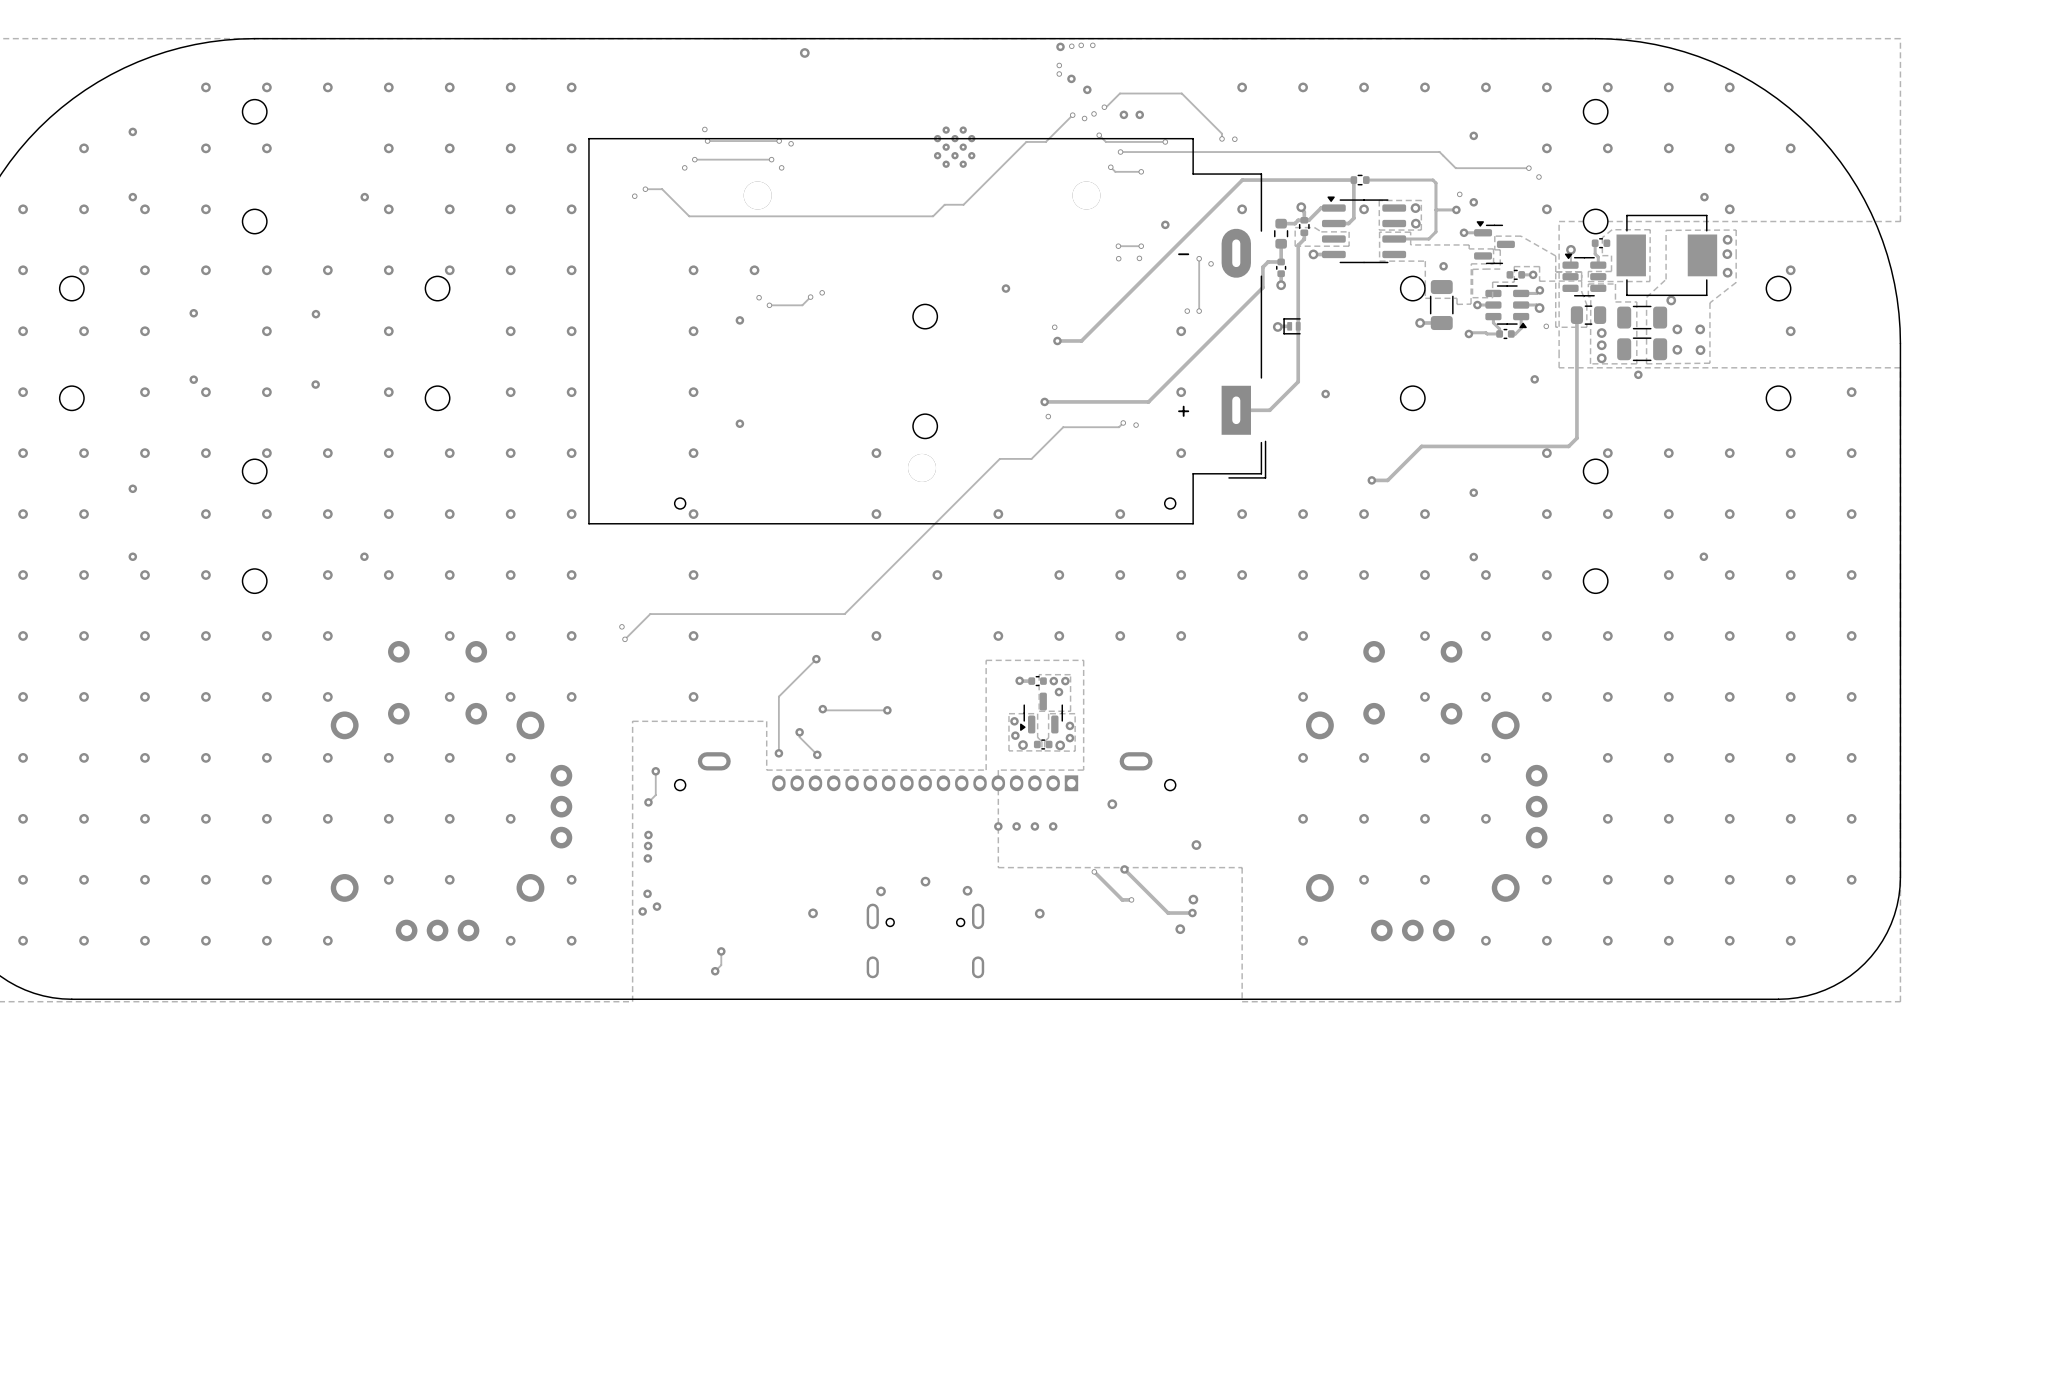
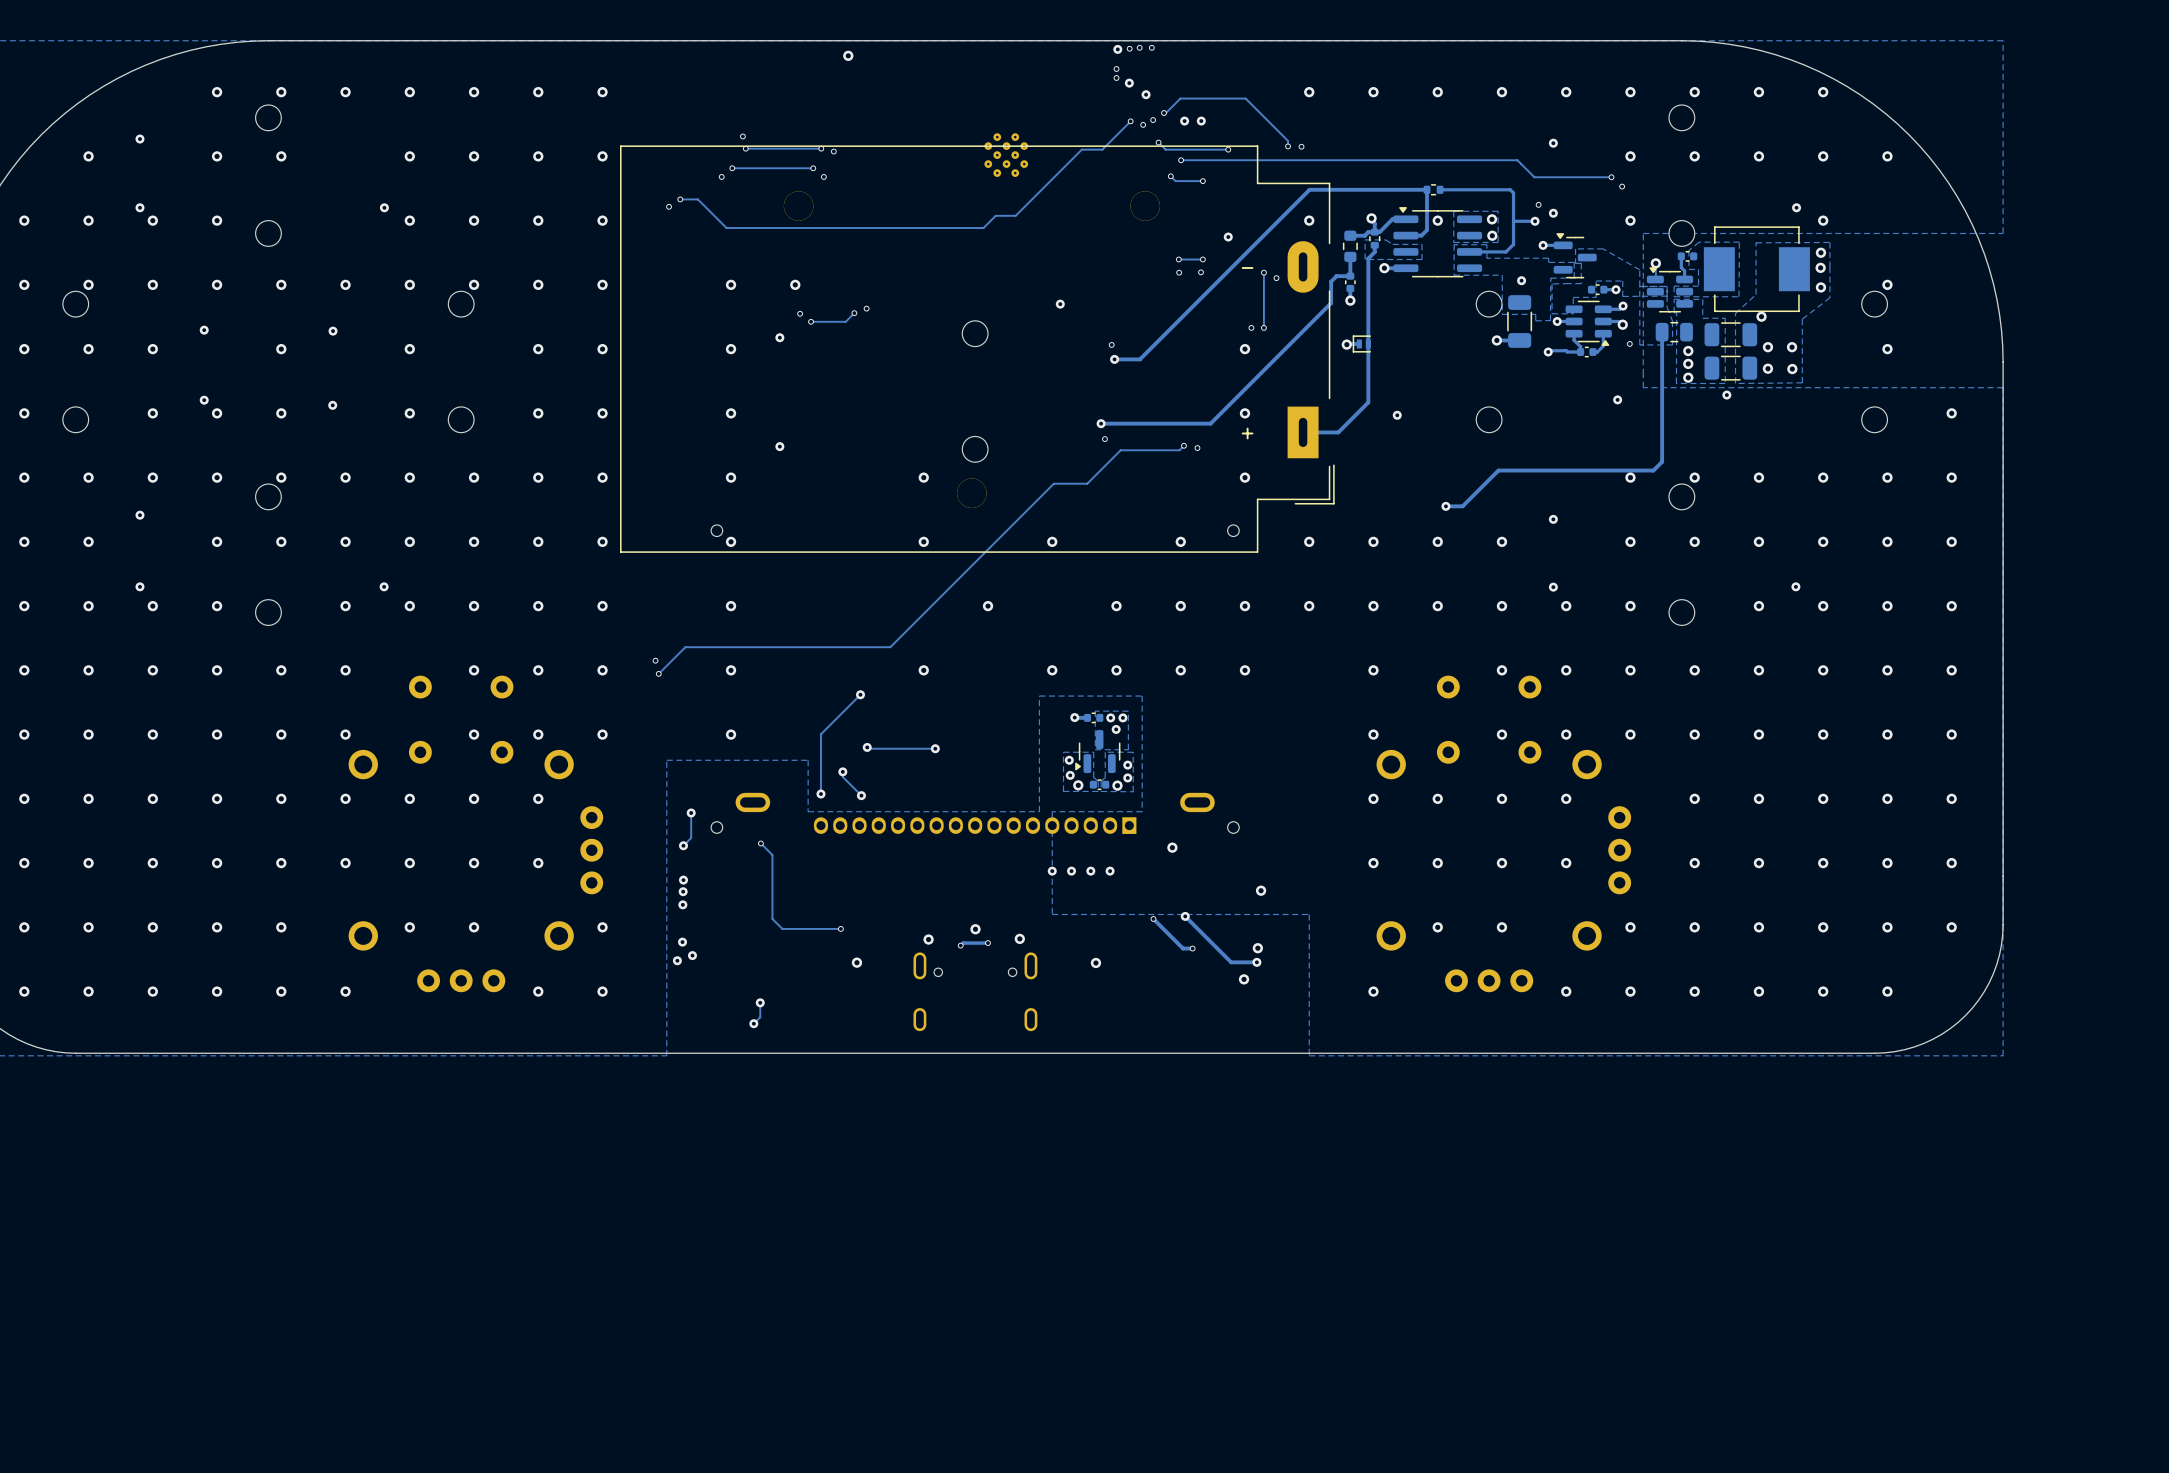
track: none -> (760, 843) (772, 855) (772, 918) (782, 928) (840, 928)
via: none -> (760, 843)
via: none -> (840, 928)
track: none -> (988, 943) (963, 943) (960, 945)
via: none -> (988, 943)
via: none -> (960, 945)

